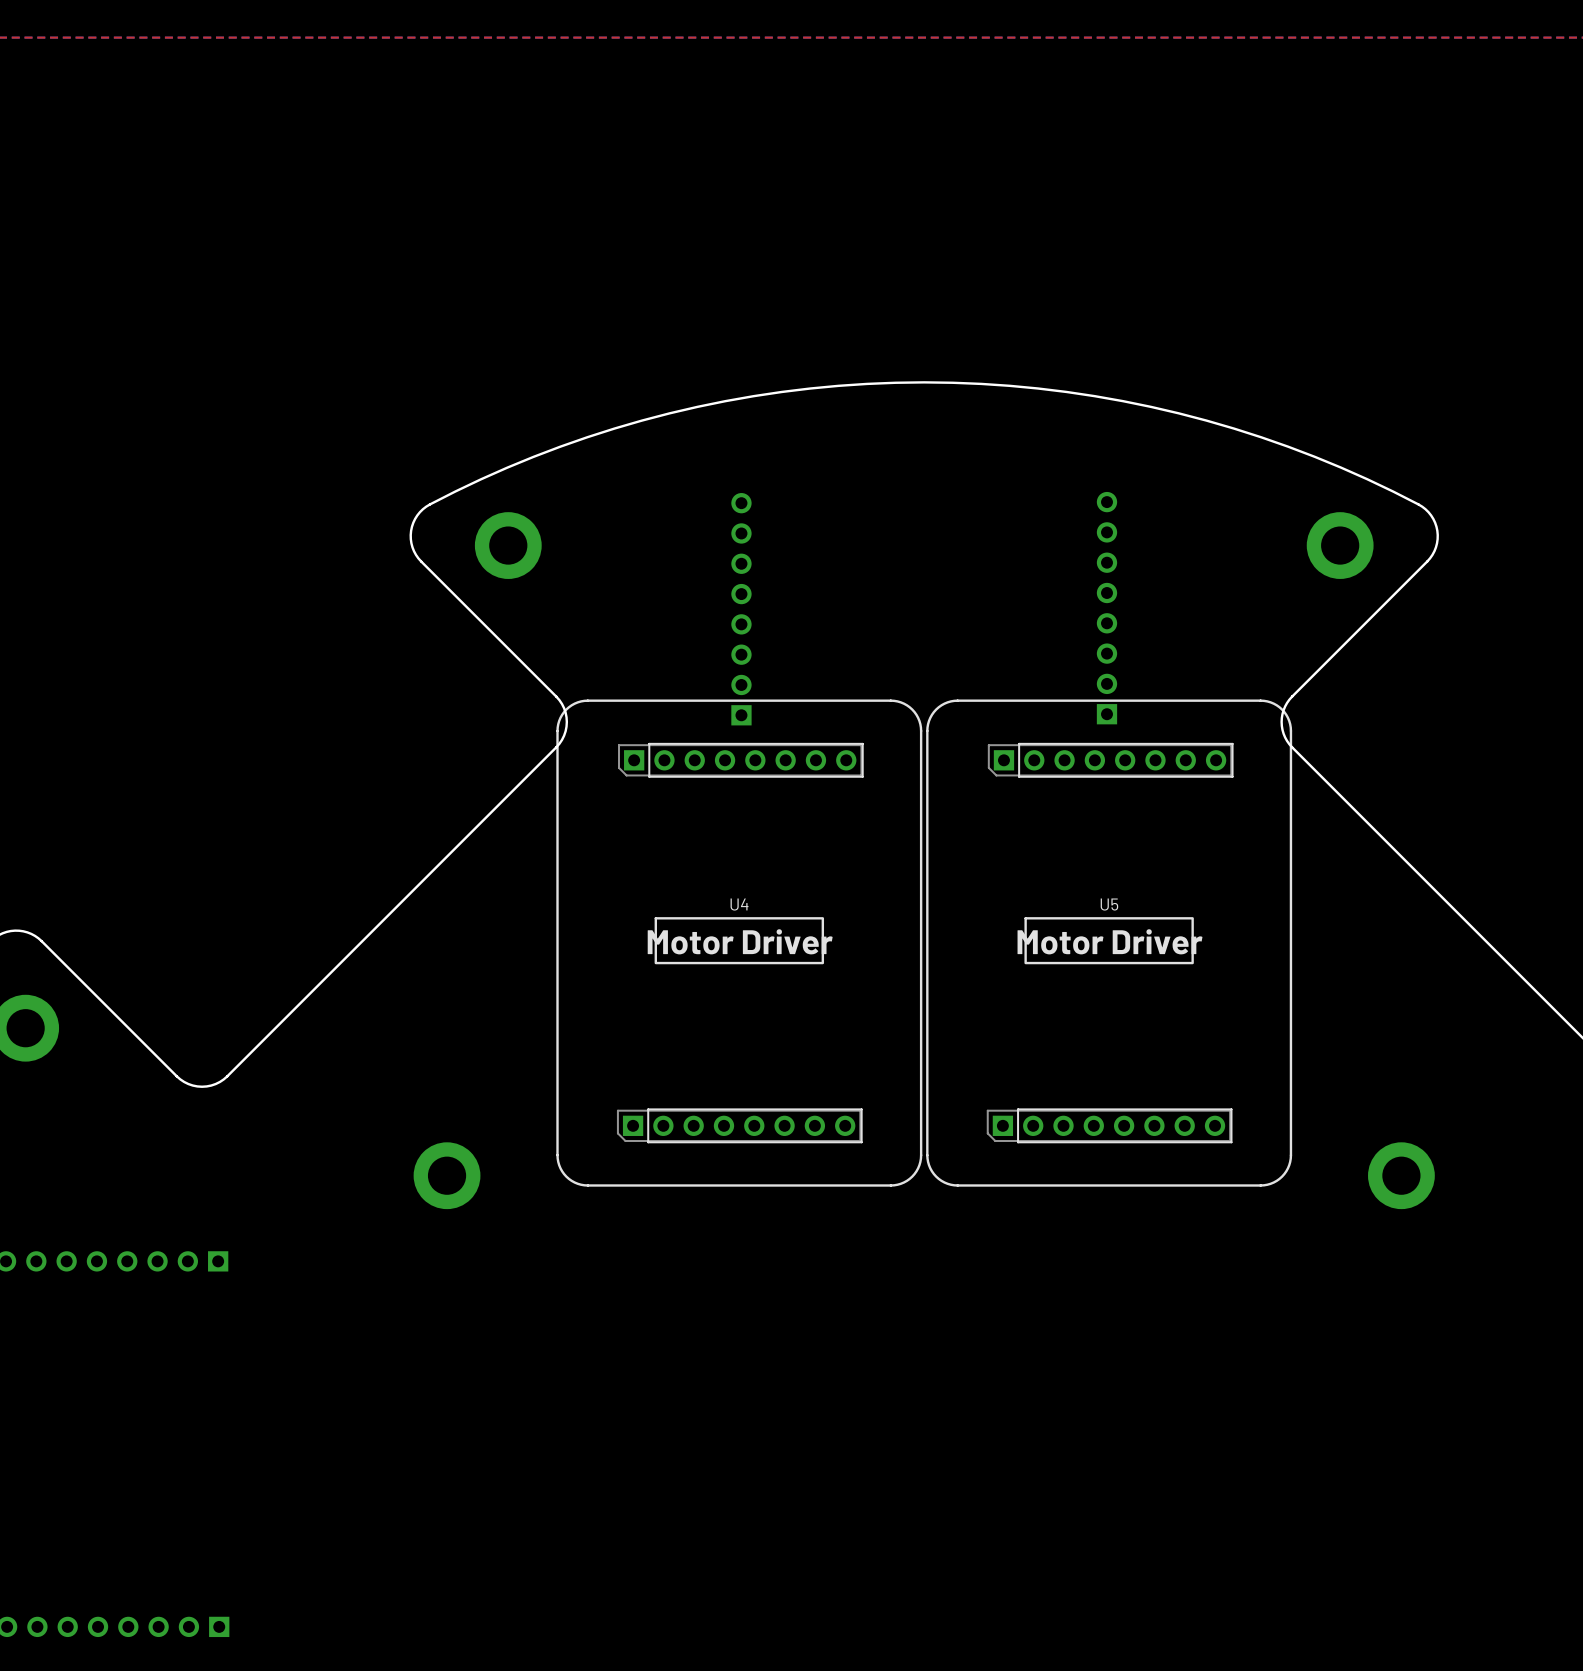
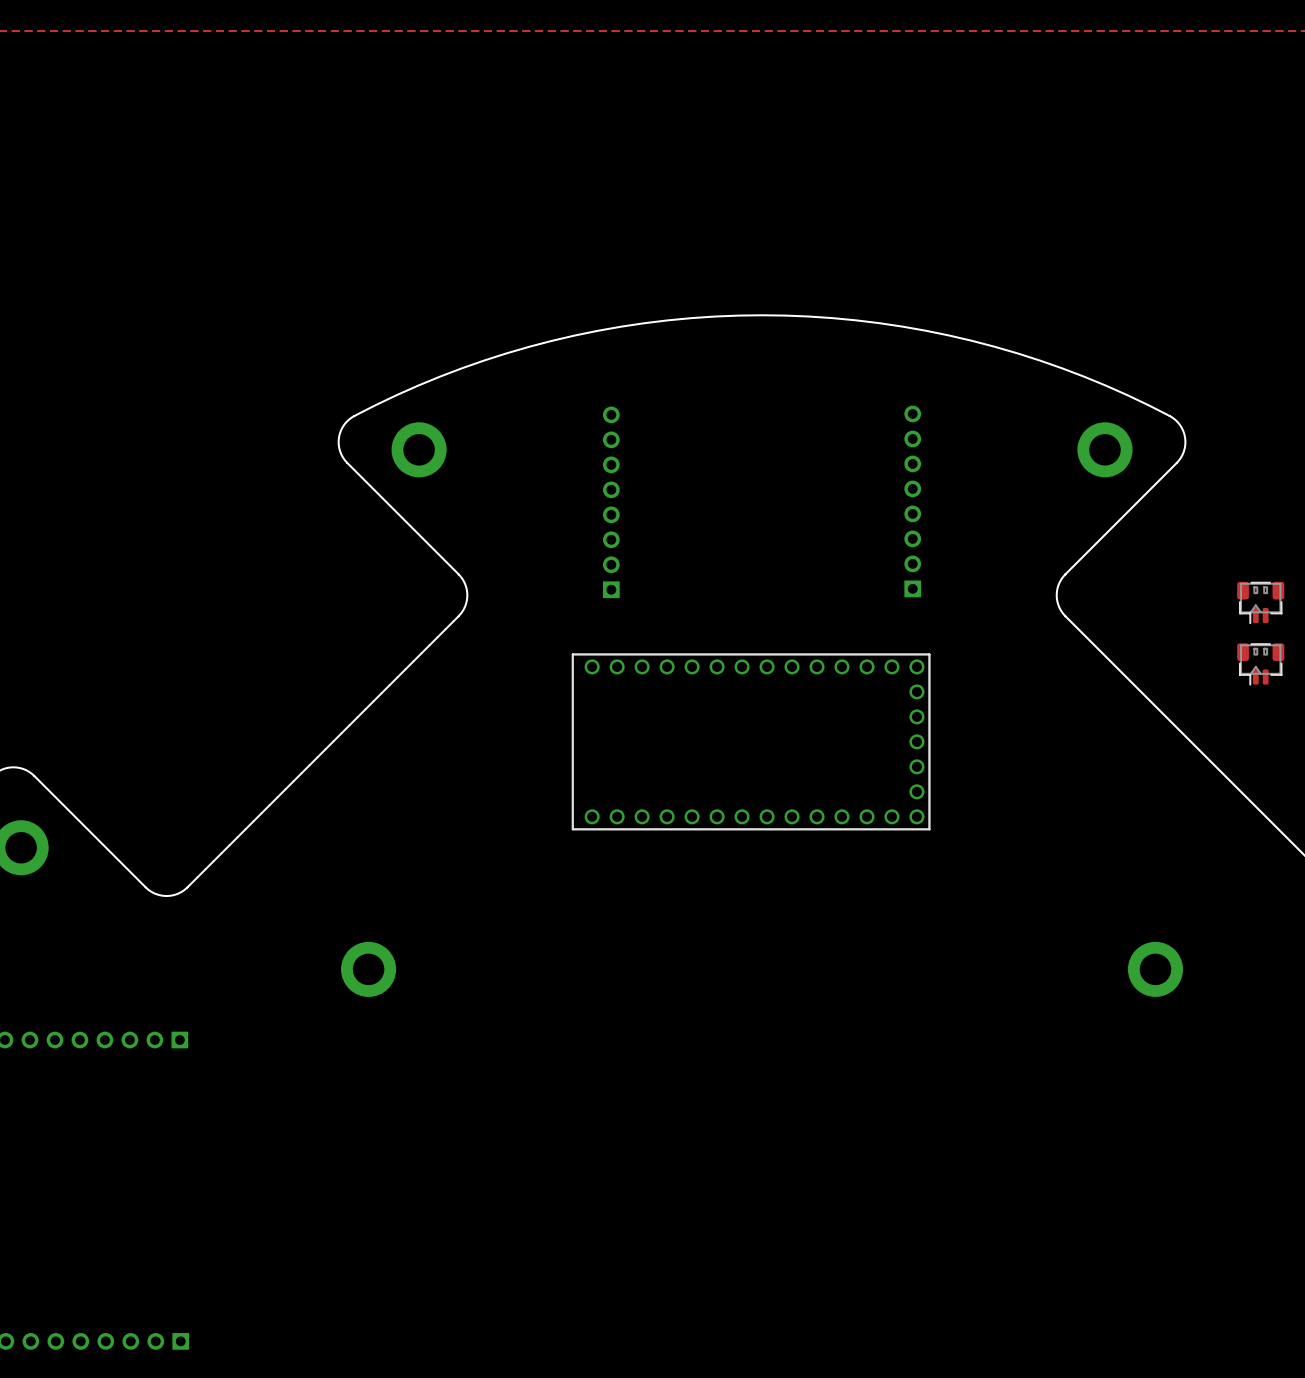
part: none -> (1260, 602)
part: none -> (1260, 664)
part: none -> (751, 741)
U4: (739, 943) -> none
U5: (1109, 943) -> none

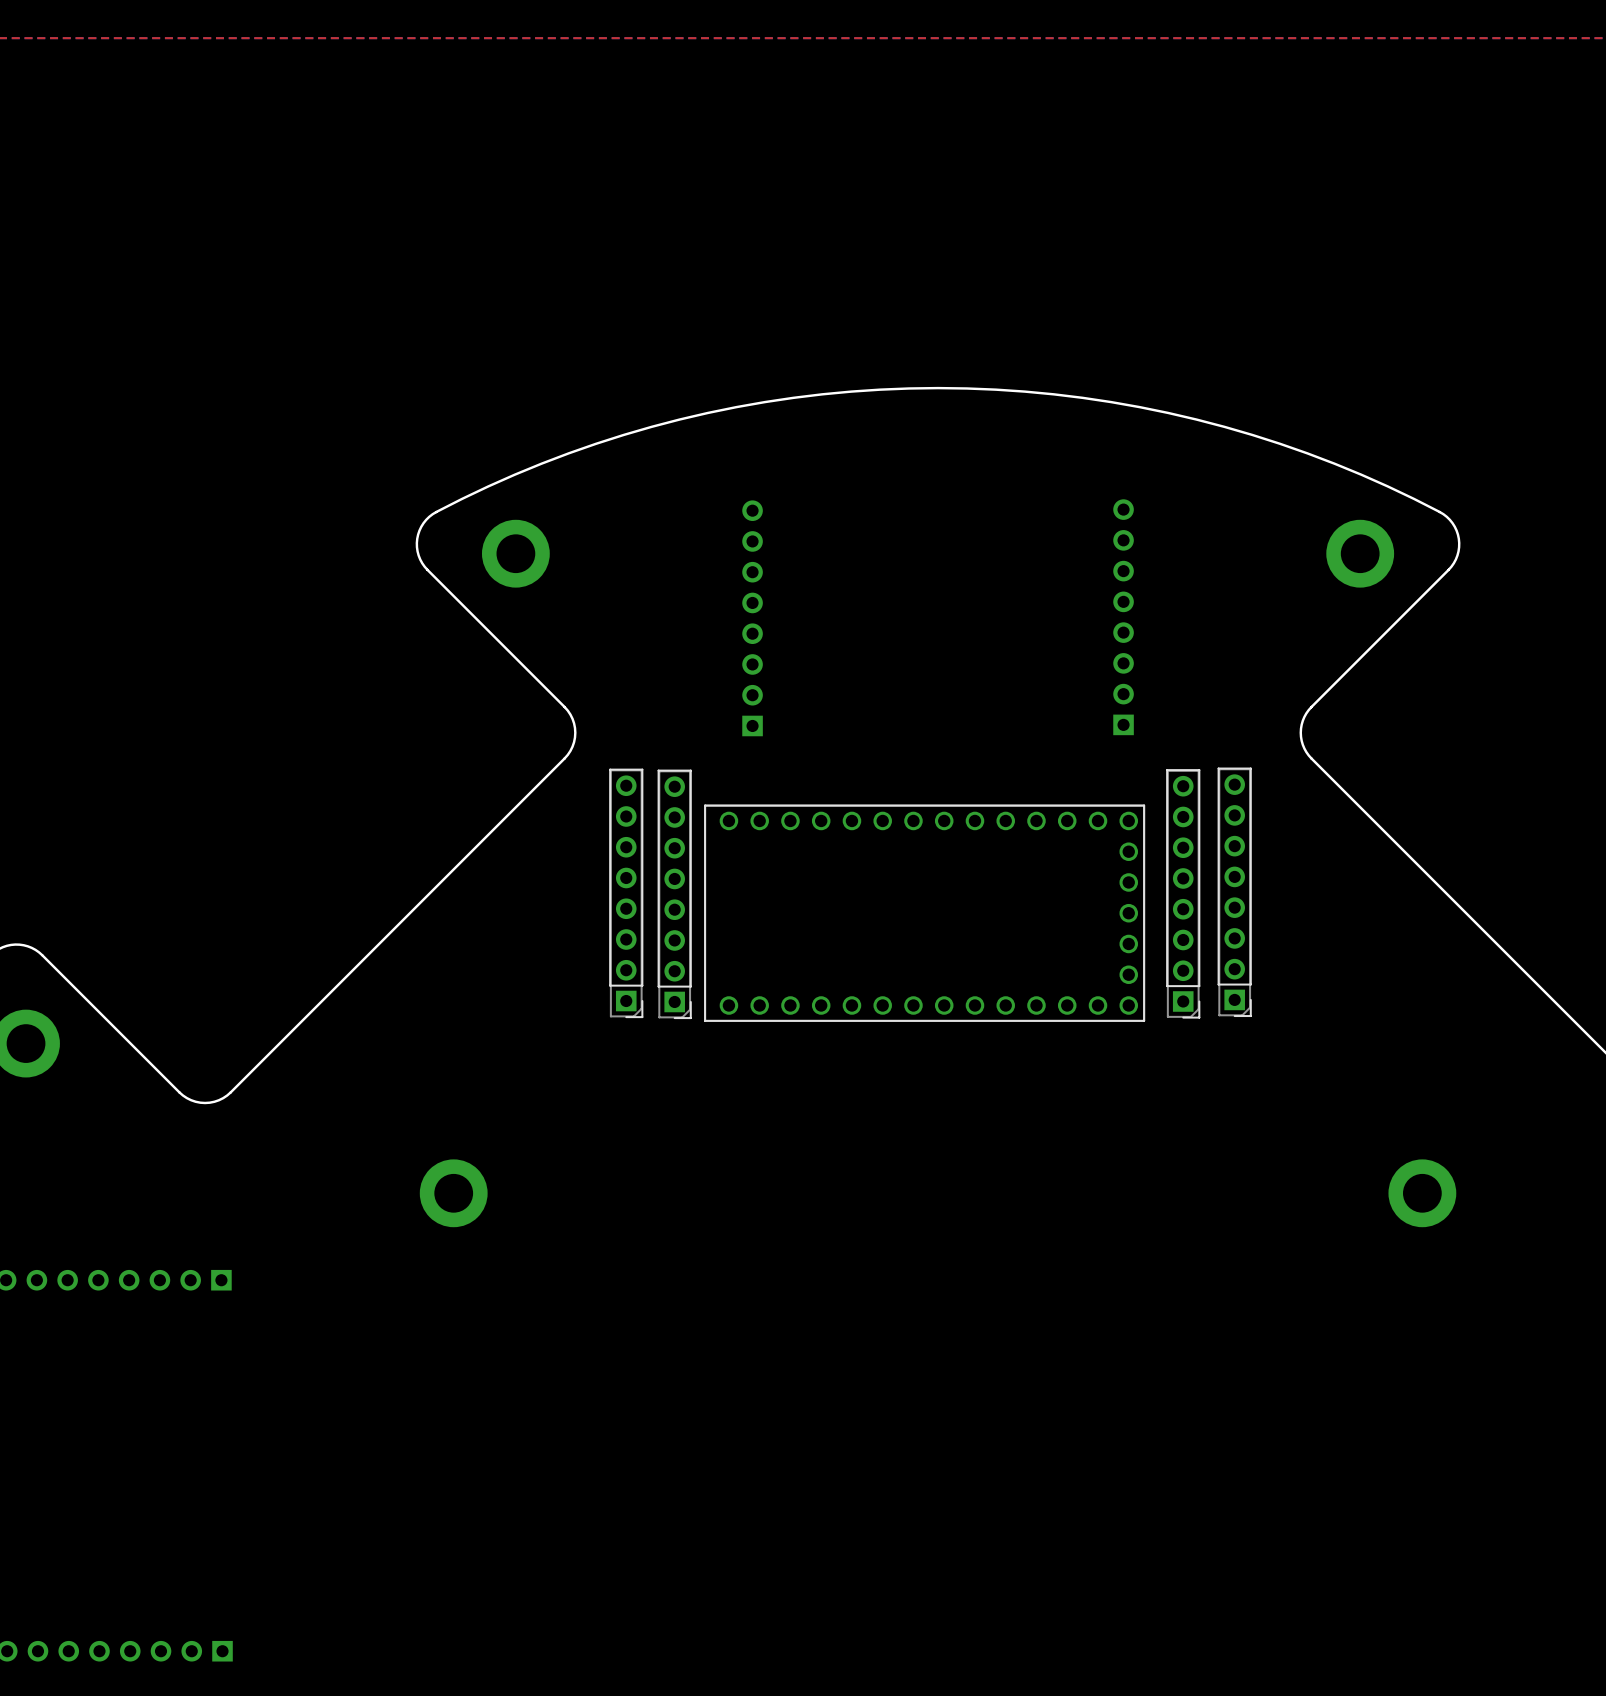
part: (1260, 602) -> none
part: (1260, 664) -> none
part: none -> (1234, 892)
part: none -> (626, 893)
part: none -> (674, 894)
part: none -> (1183, 893)

